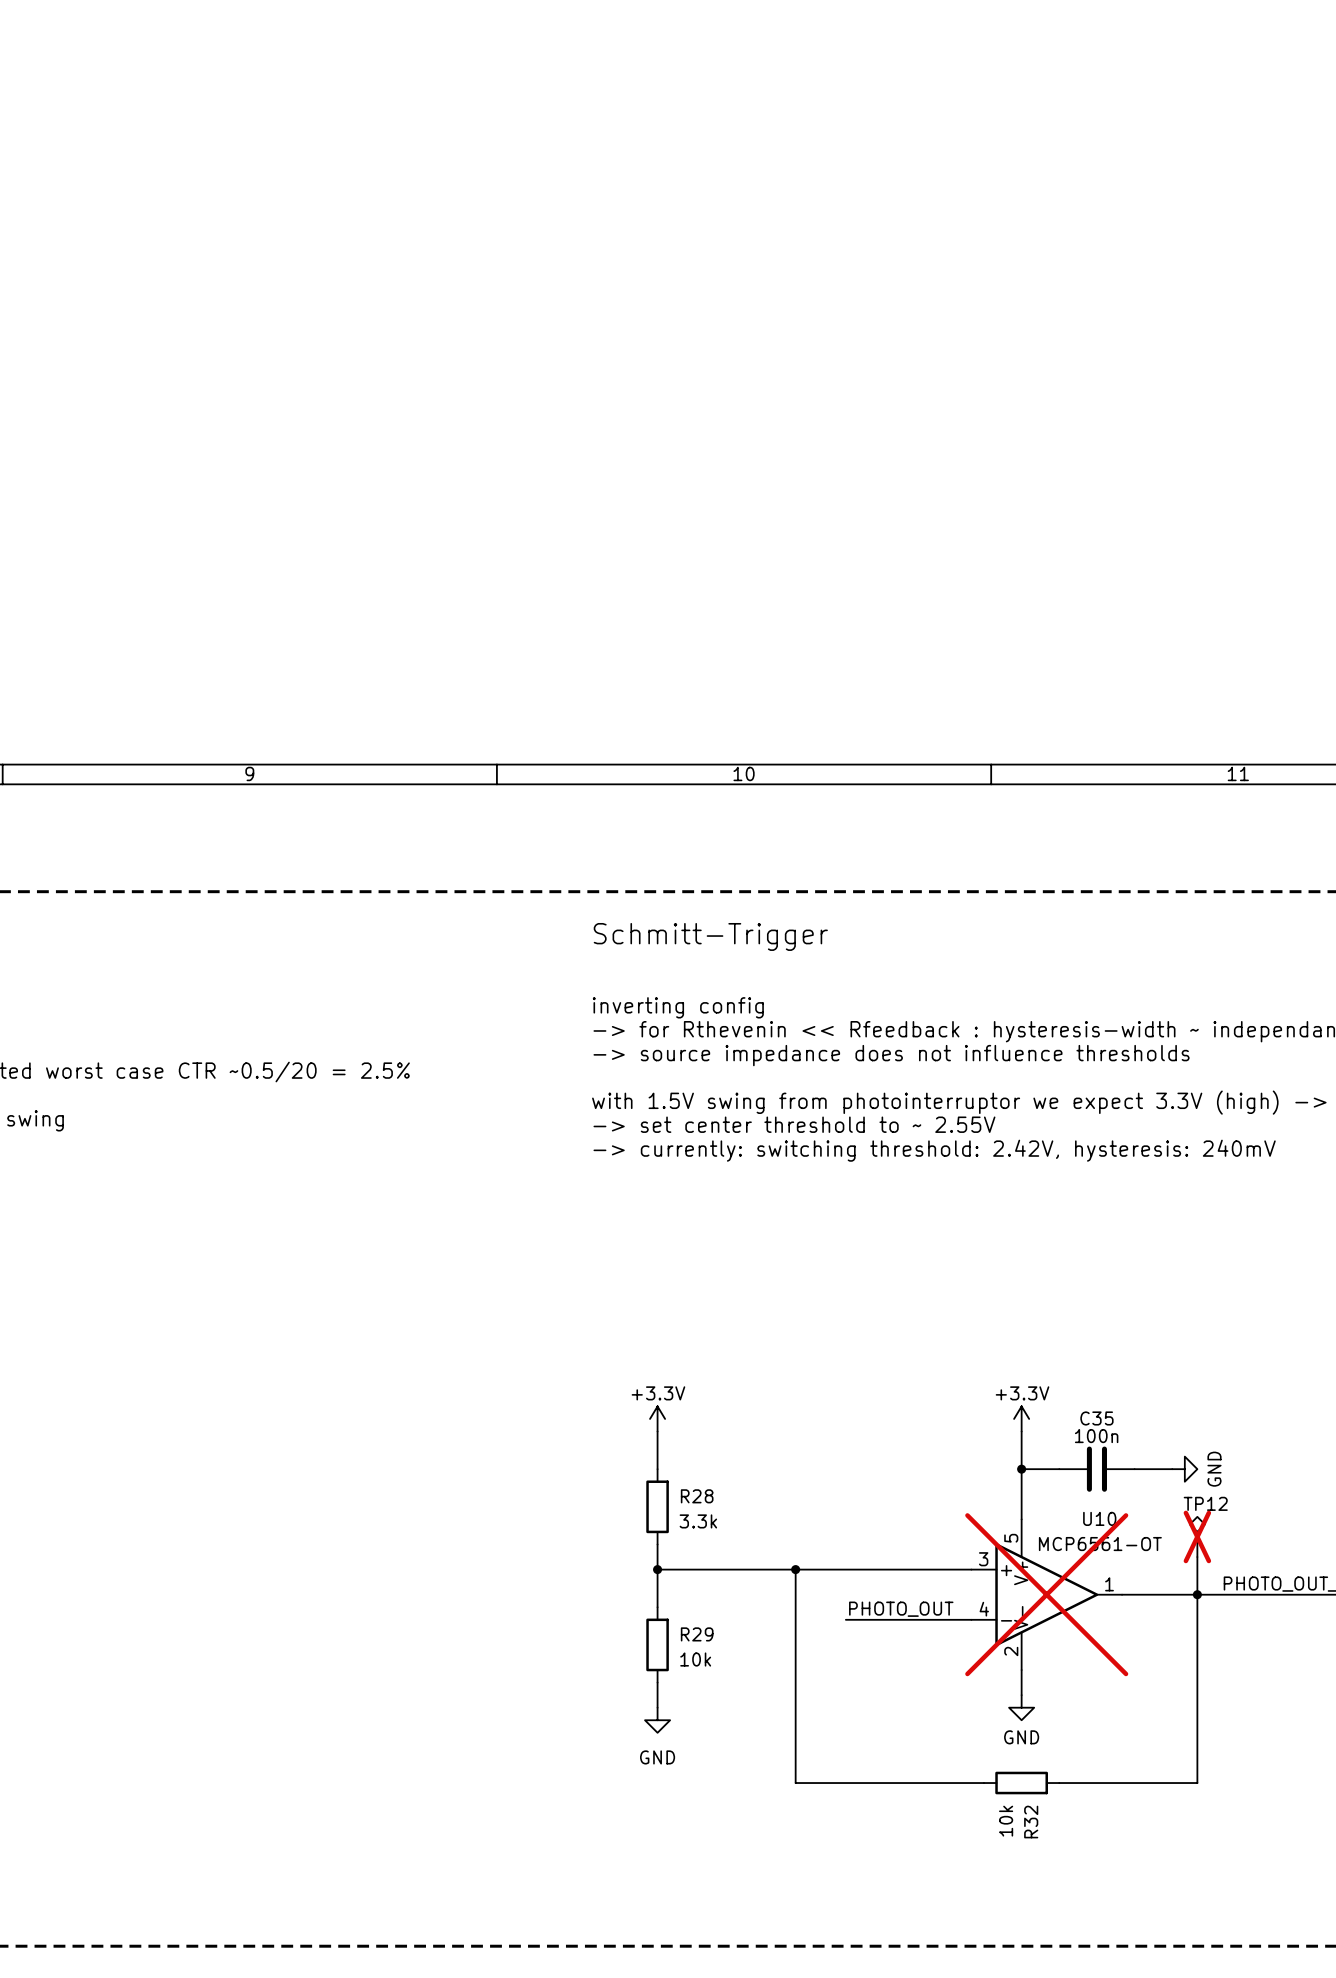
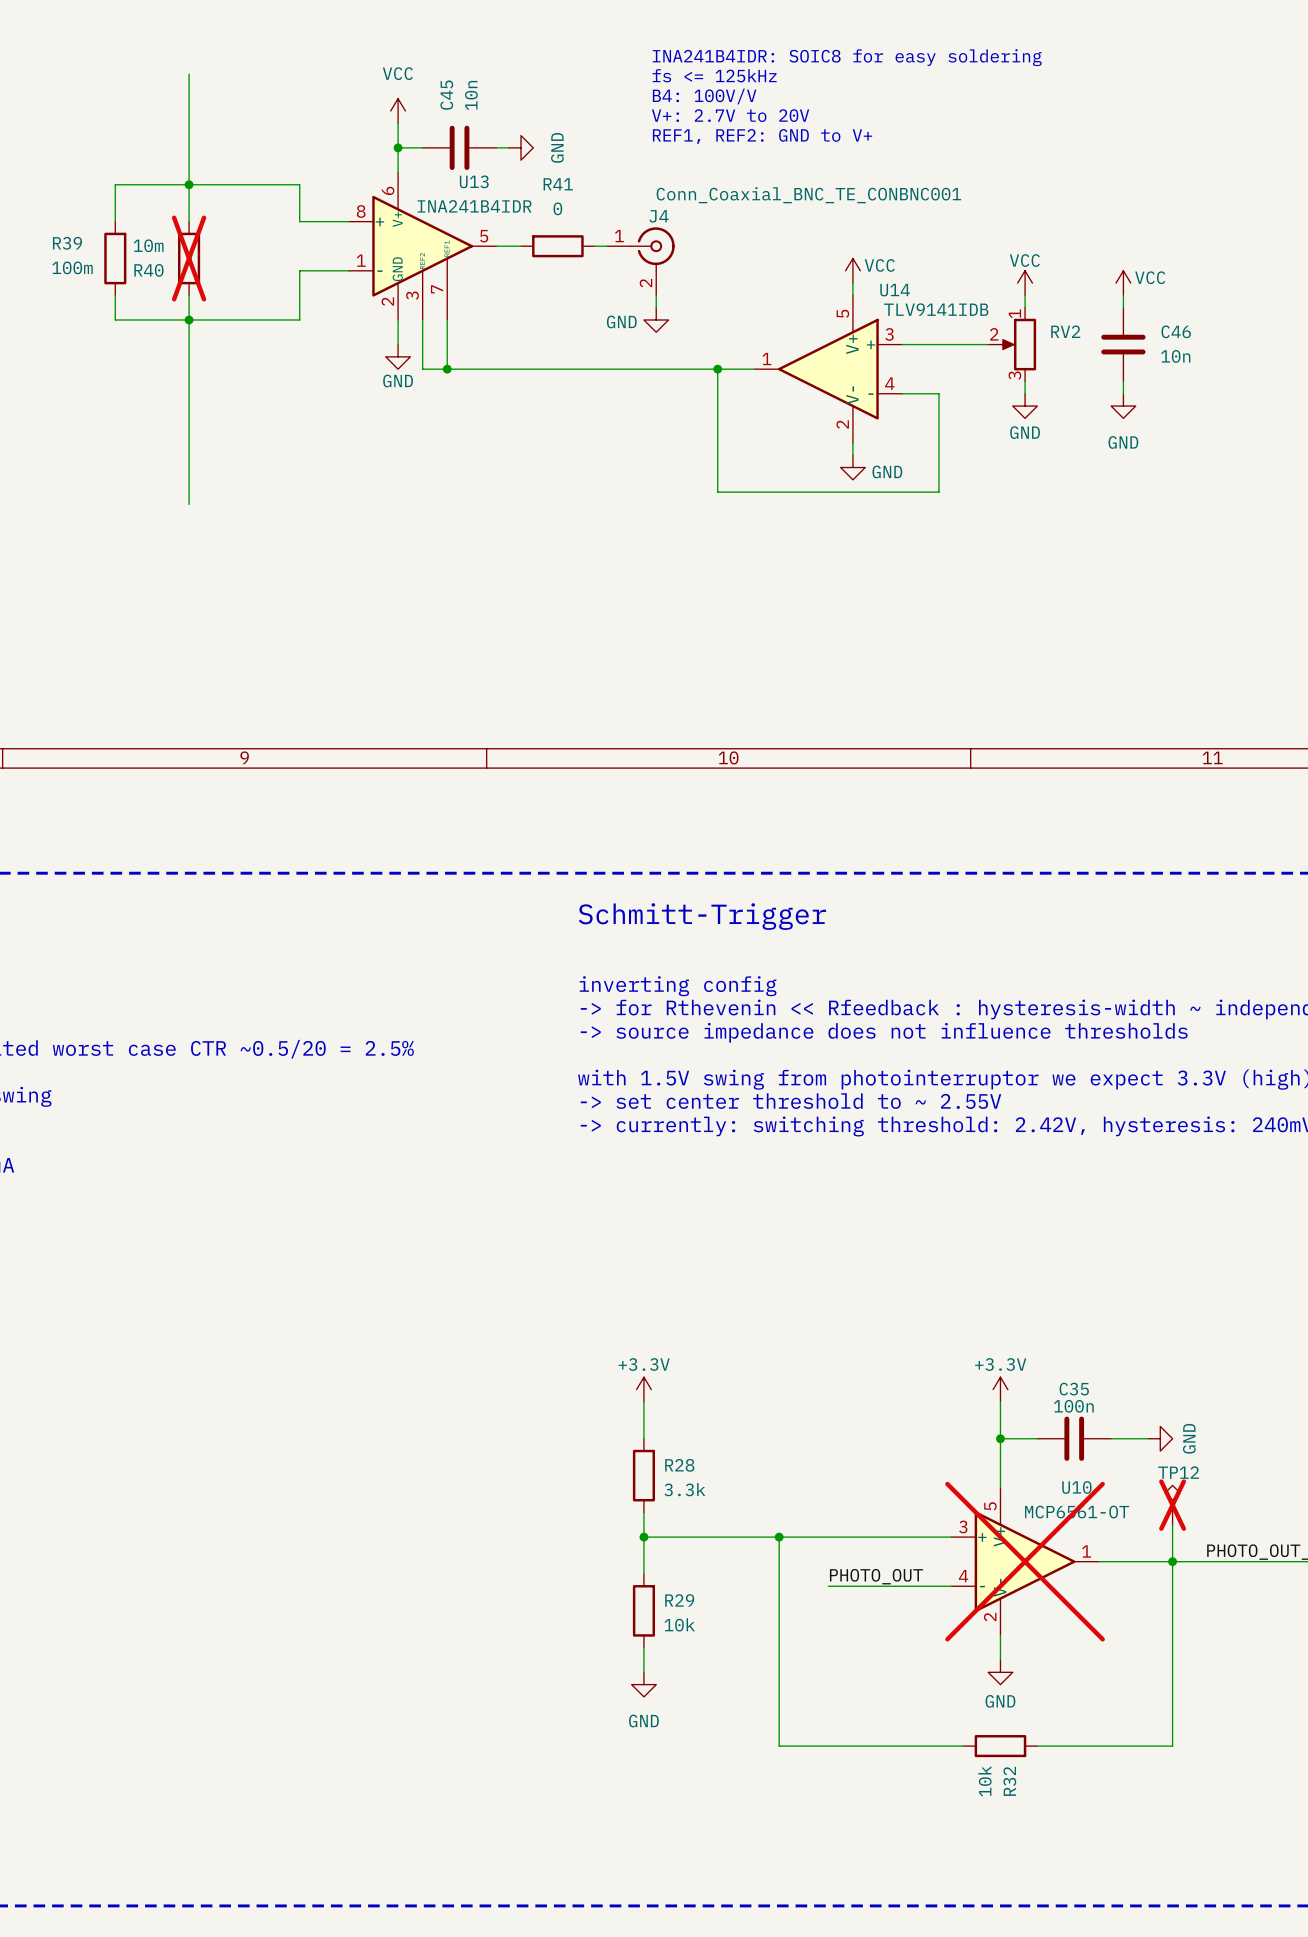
text: none -> INA241B4IDR: SOIC8 for easy soldering (847, 57)
wire: none -> (189, 74) (189, 221)
text: none -> fs <= 125kHz (714, 75)
text: none -> B4: 100V/V (704, 96)
power symbol: none -> VCC (398, 110)
text: none -> V+: 2.7V to 20V (730, 115)
wire: none -> (398, 123) (398, 172)
text: none -> REF1, REF2: GND to V+ (762, 136)
wire: none -> (398, 147) (422, 147)
junction: none -> (398, 147)
C45: none -> 10n (459, 147)
wire: none -> (496, 147) (508, 147)
power symbol: none -> GND (521, 147)
junction: none -> (189, 184)
wire: none -> (115, 221) (115, 184) (299, 184) (299, 221) (348, 221)
U13: none -> INA241B4IDR (422, 246)
wire: none -> (496, 246) (521, 246)
R41: none -> 0 (557, 246)
wire: none -> (594, 246) (607, 246)
R39: none -> 100m (115, 258)
R40: none -> 10m (189, 258)
J4: none -> Conn_Coaxial_BNC_TE_CONBNC001 (640, 261)
wire: none -> (348, 270) (299, 270) (299, 319) (115, 319) (115, 295)
power symbol: none -> VCC (852, 270)
wire: none -> (852, 283) (852, 295)
power symbol: none -> VCC (1025, 283)
power symbol: none -> VCC (1123, 283)
wire: none -> (189, 295) (189, 504)
wire: none -> (656, 295) (656, 307)
wire: none -> (1025, 295) (1025, 307)
wire: none -> (1123, 295) (1123, 307)
junction: none -> (189, 319)
wire: none -> (398, 319) (398, 344)
wire: none -> (422, 319) (422, 369) (754, 369)
wire: none -> (447, 319) (447, 369)
power symbol: none -> GND (656, 319)
wire: none -> (902, 344) (988, 344)
RV2: none -> (1012, 344)
C46: none -> 10n (1123, 344)
power symbol: none -> GND (398, 356)
junction: none -> (447, 369)
wire: none -> (717, 369) (717, 492) (939, 492) (939, 393) (902, 393)
junction: none -> (717, 369)
U14: none -> TLV9141IDB (828, 369)
wire: none -> (1025, 381) (1025, 393)
wire: none -> (1123, 381) (1123, 393)
power symbol: none -> GND (1025, 406)
power symbol: none -> GND (1123, 406)
wire: none -> (852, 442) (852, 455)
power symbol: none -> GND (852, 467)

